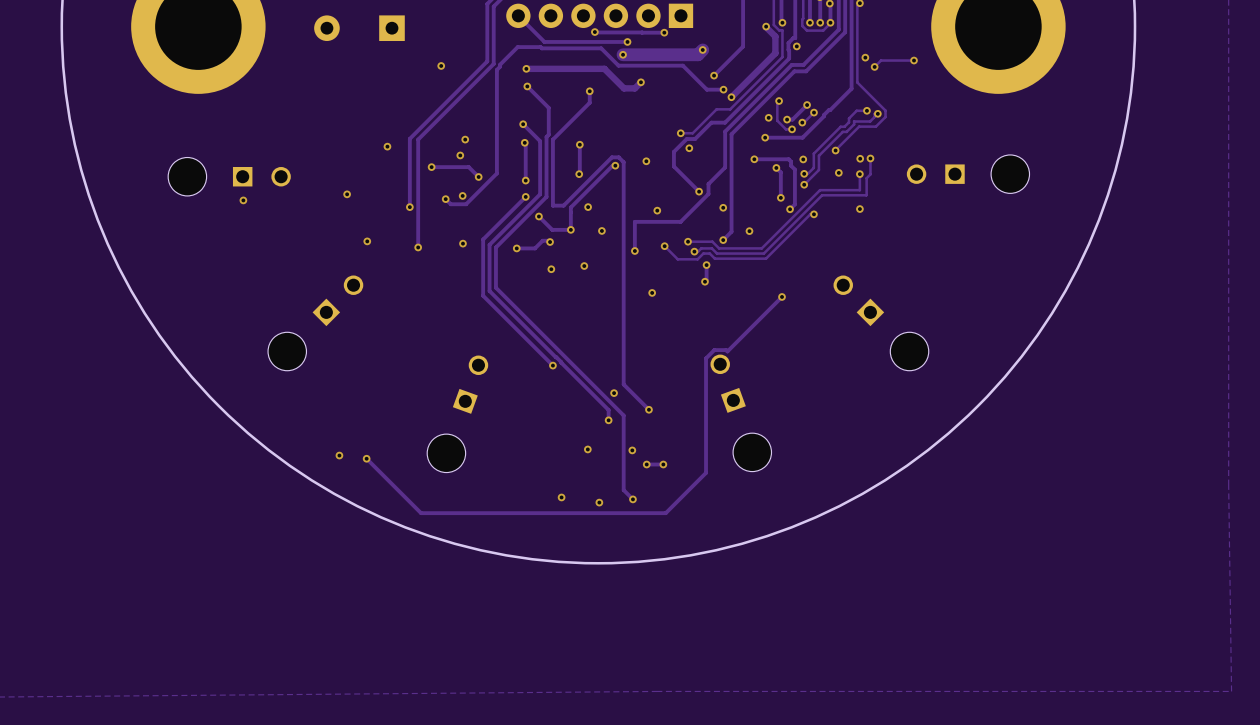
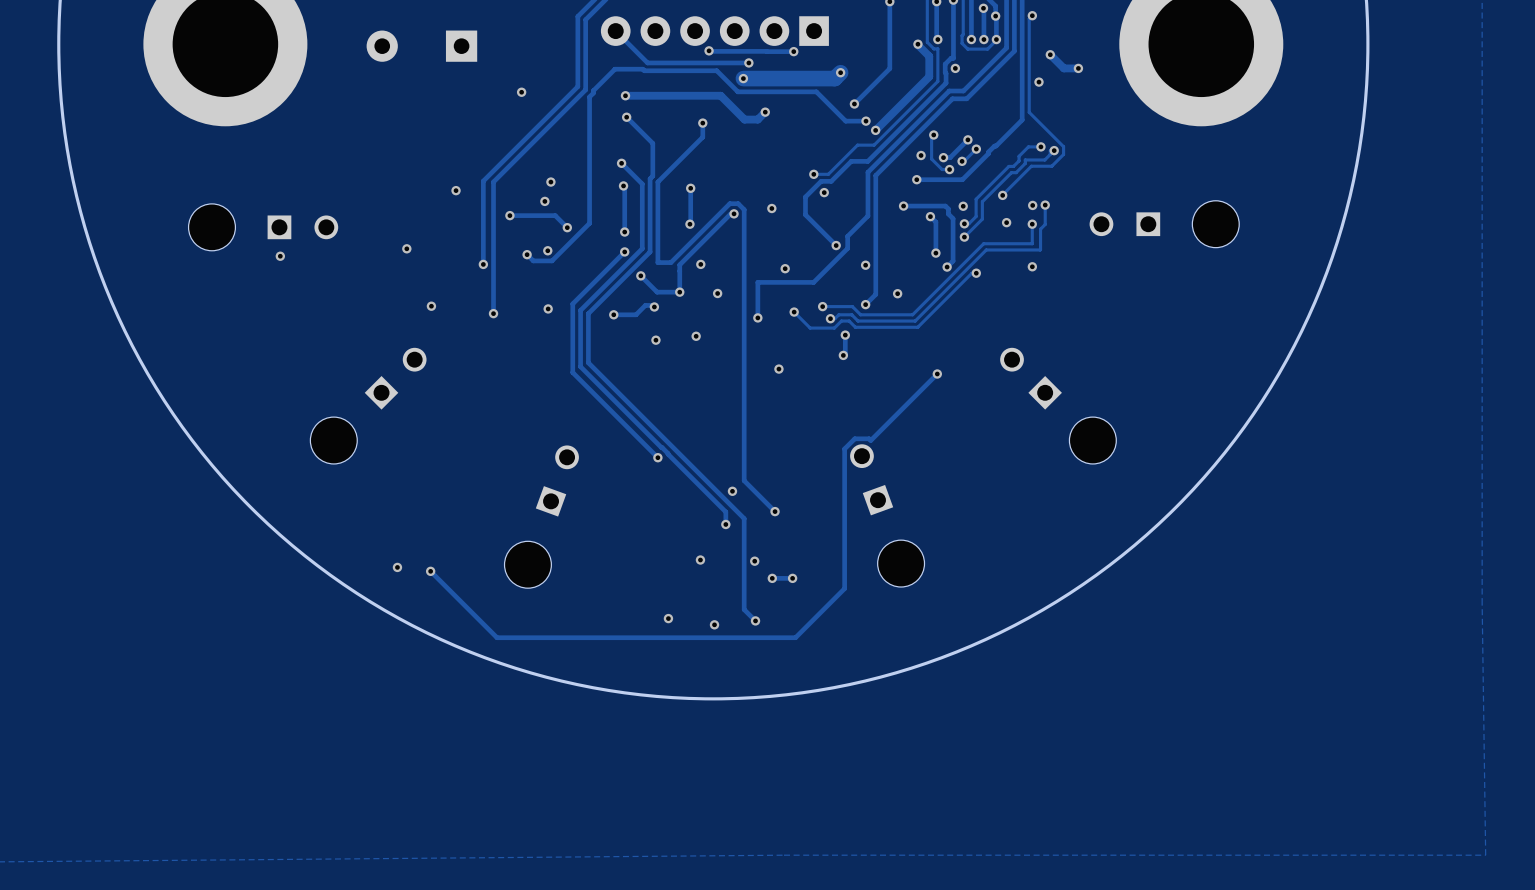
track: none -> (1050, 54) (1063, 68) (1078, 68)
via: none -> (1050, 54)
via: none -> (1078, 68)
track: (914, 60) (881, 60) (874, 66) -> none
via: (914, 60) -> none
via: (874, 66) -> none

